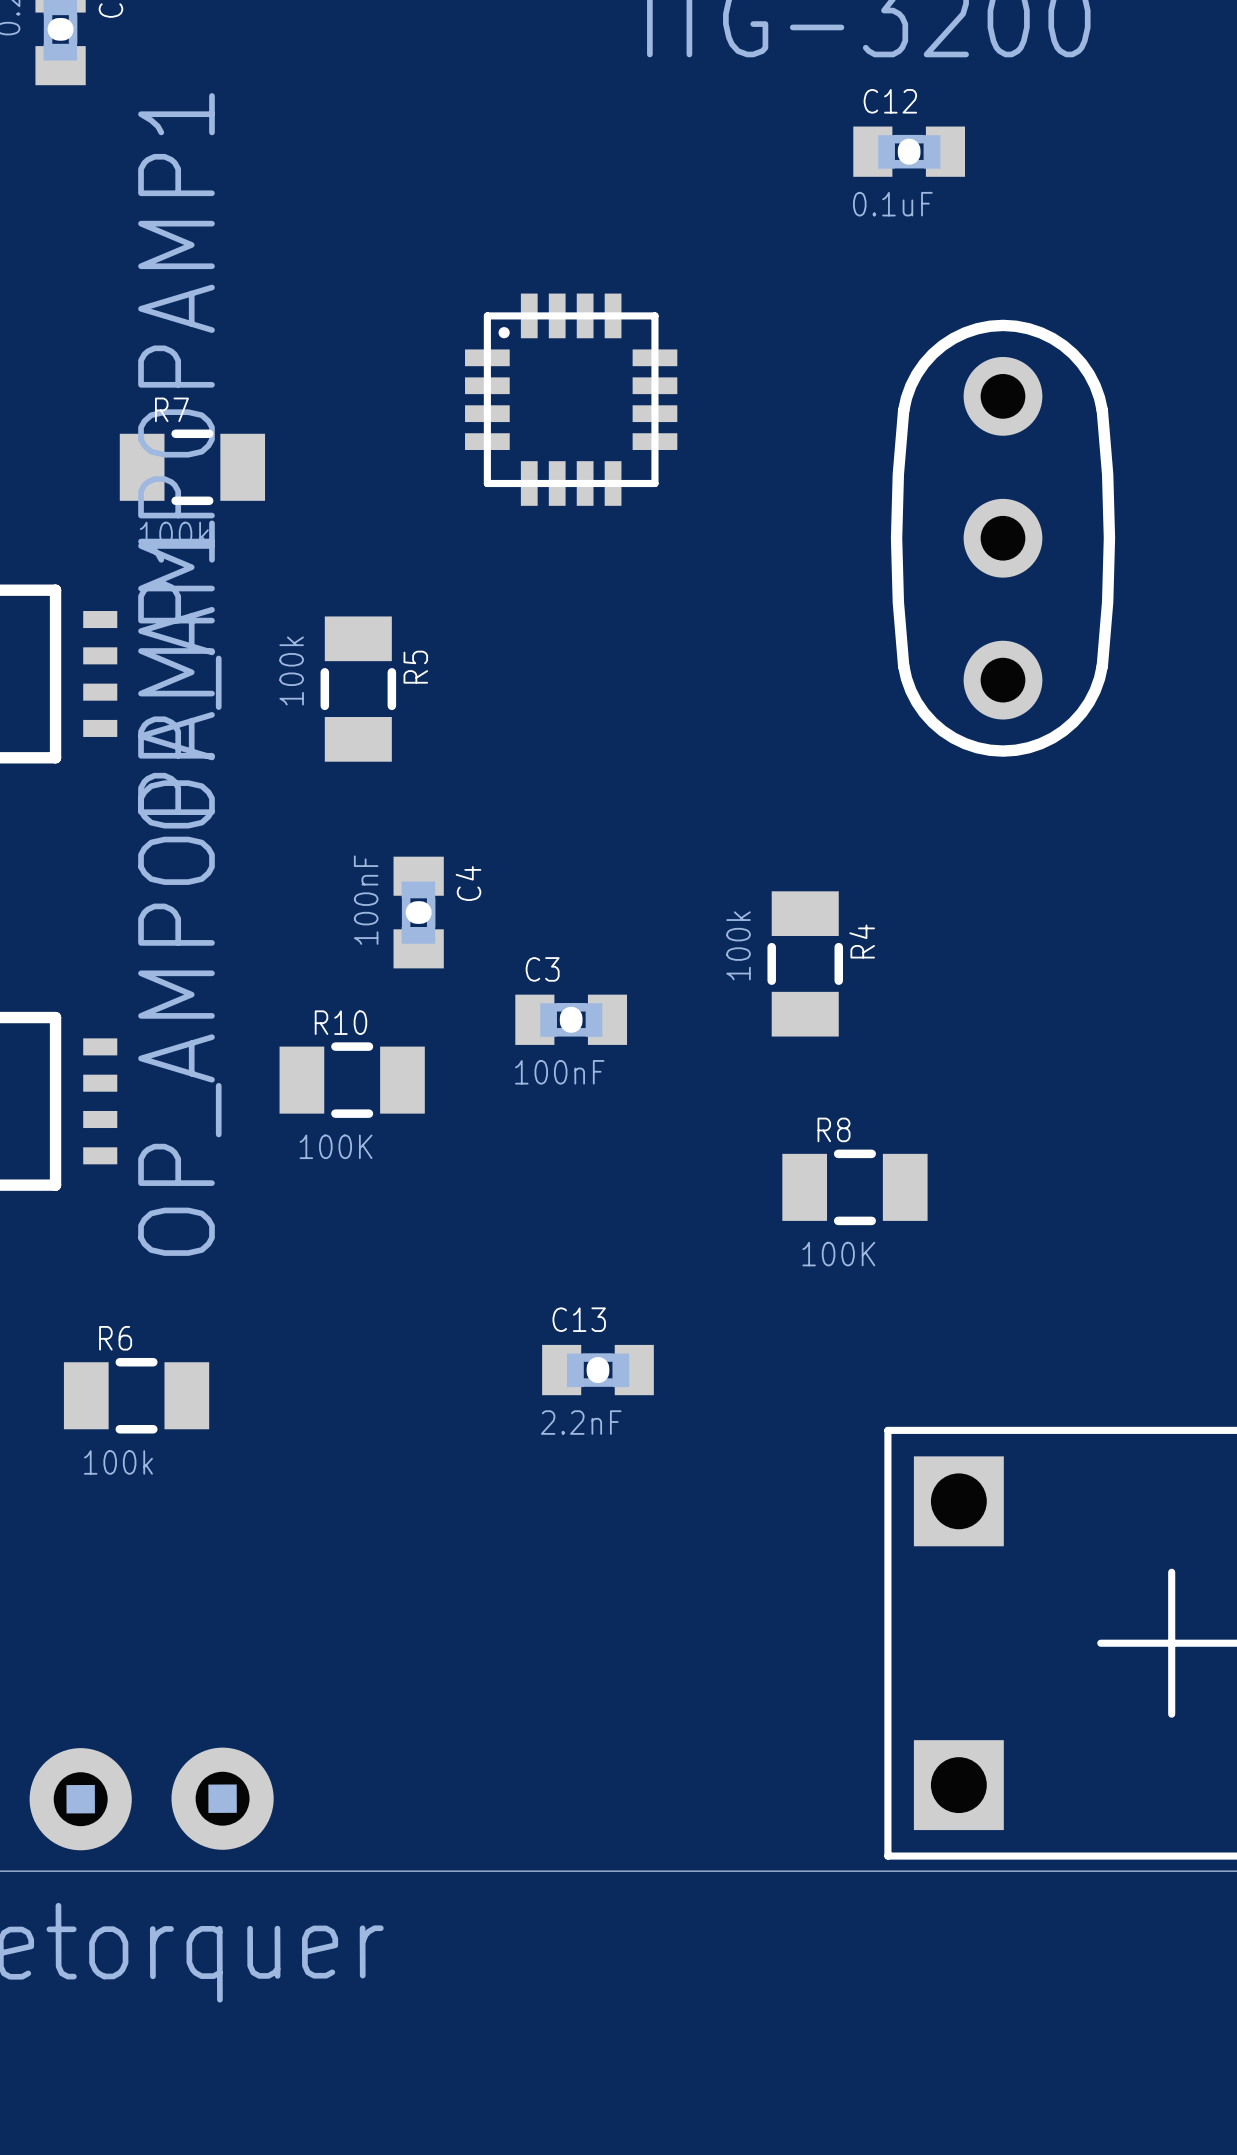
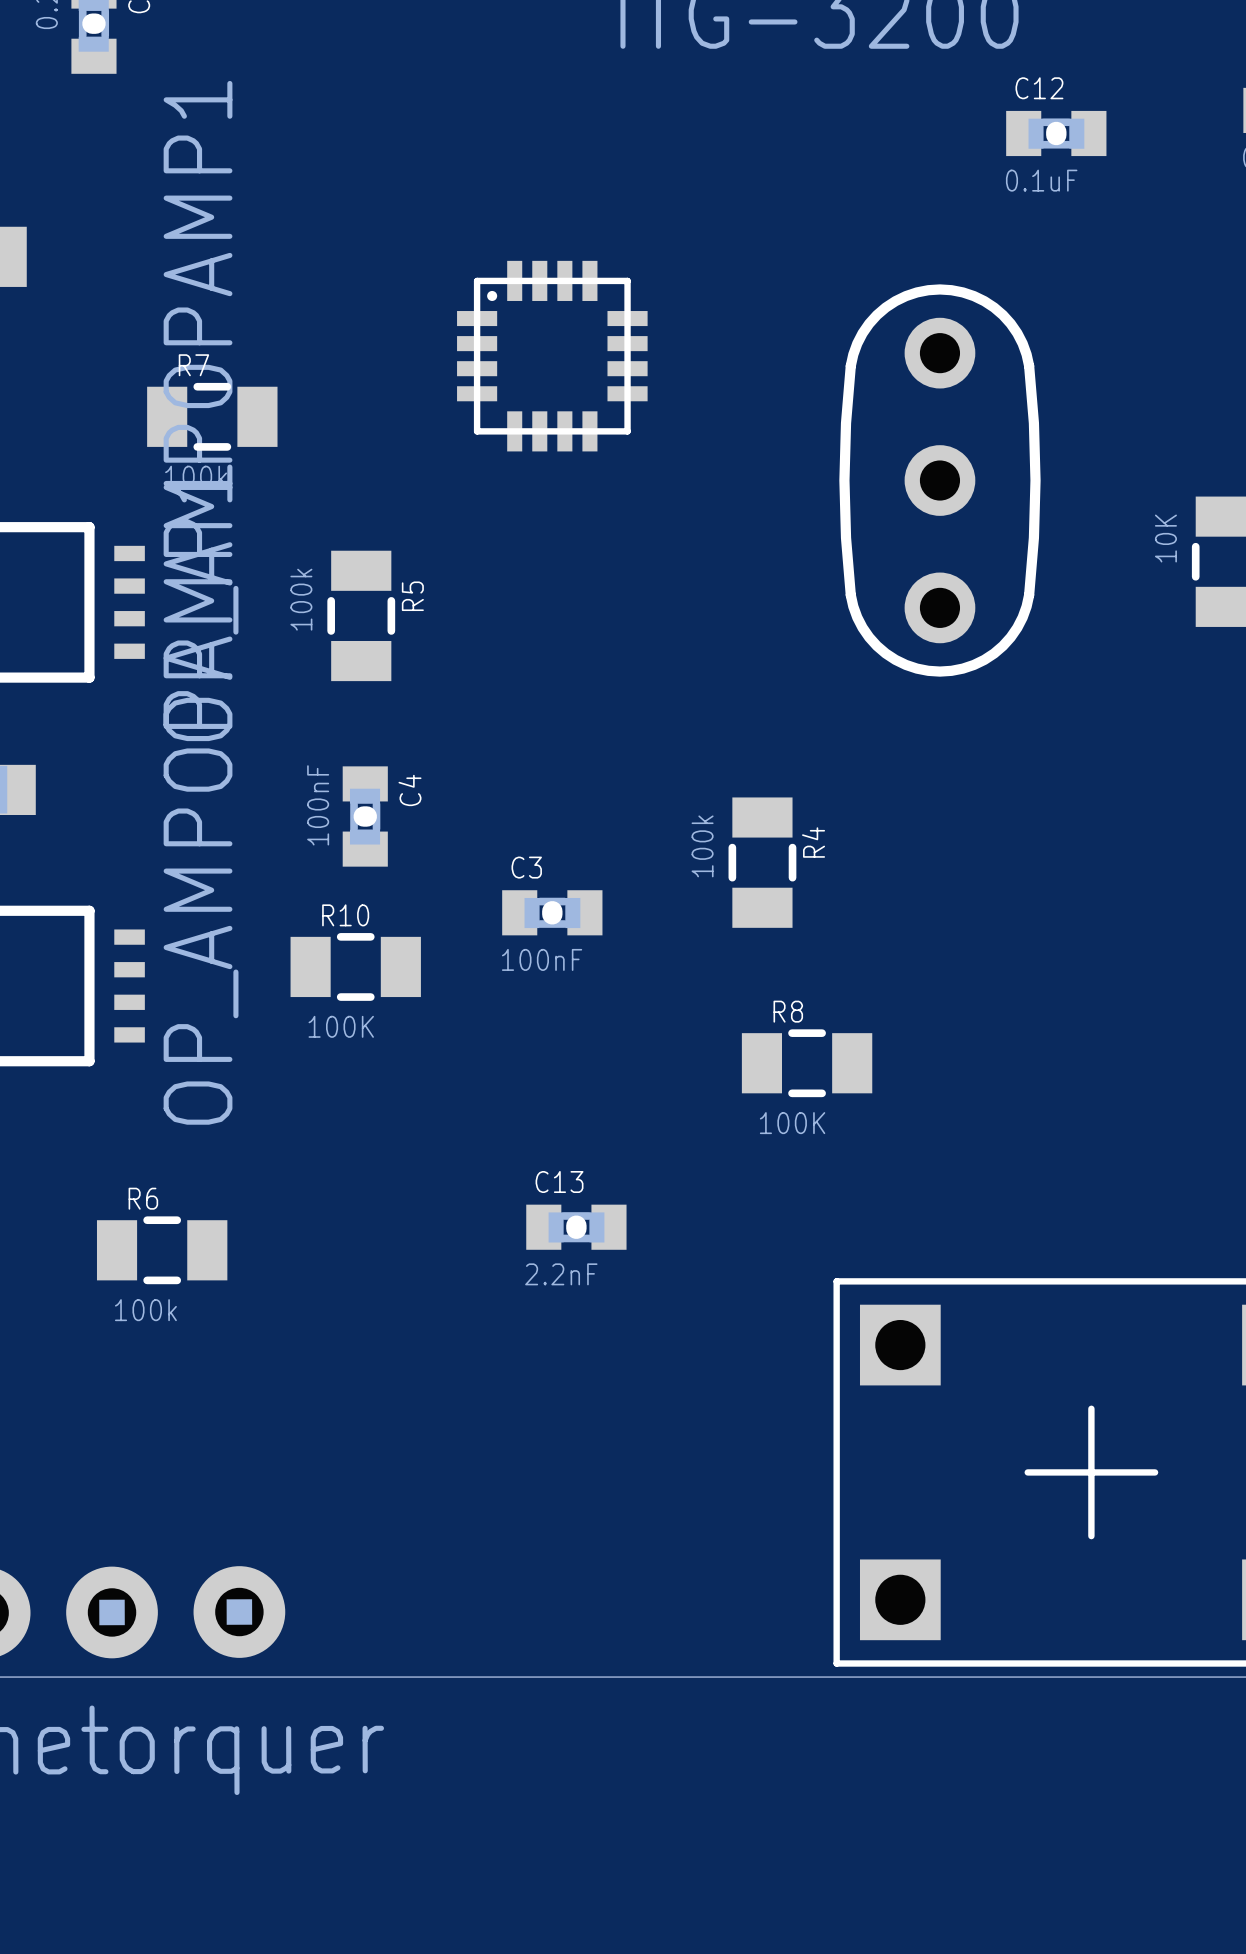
C12 position: (909, 151) -> (1056, 133)
C4 position: (418, 912) -> (365, 816)

